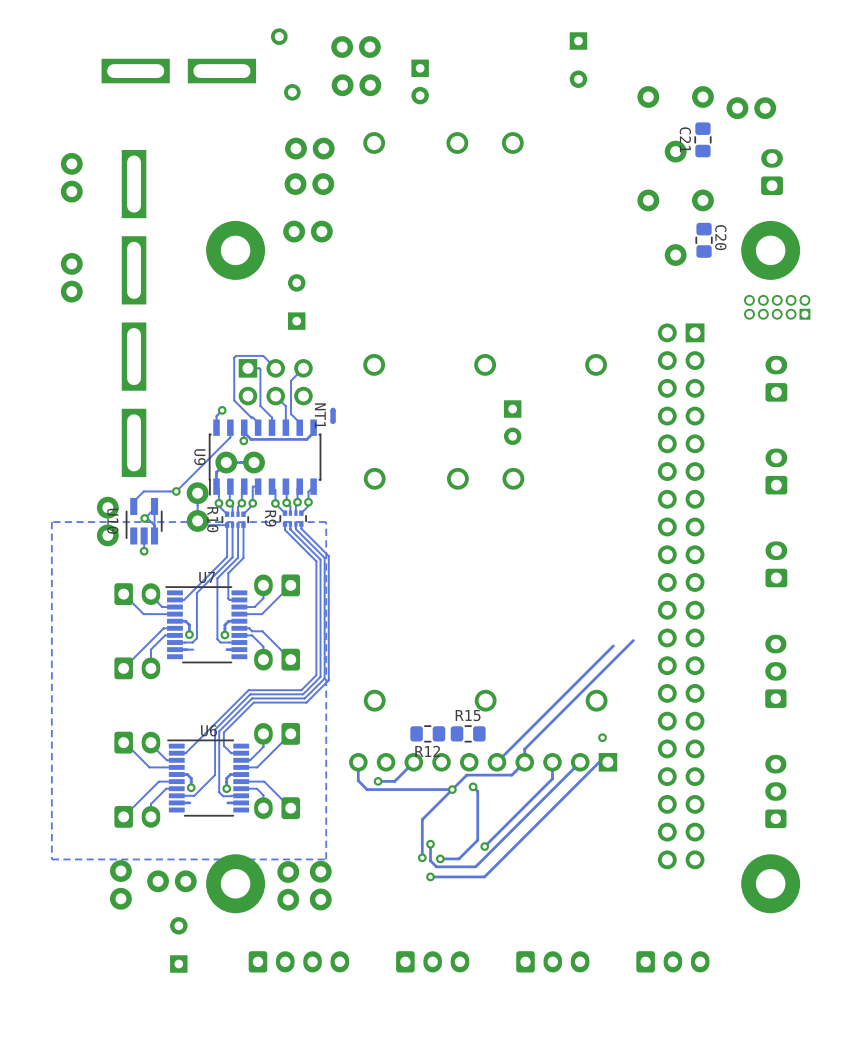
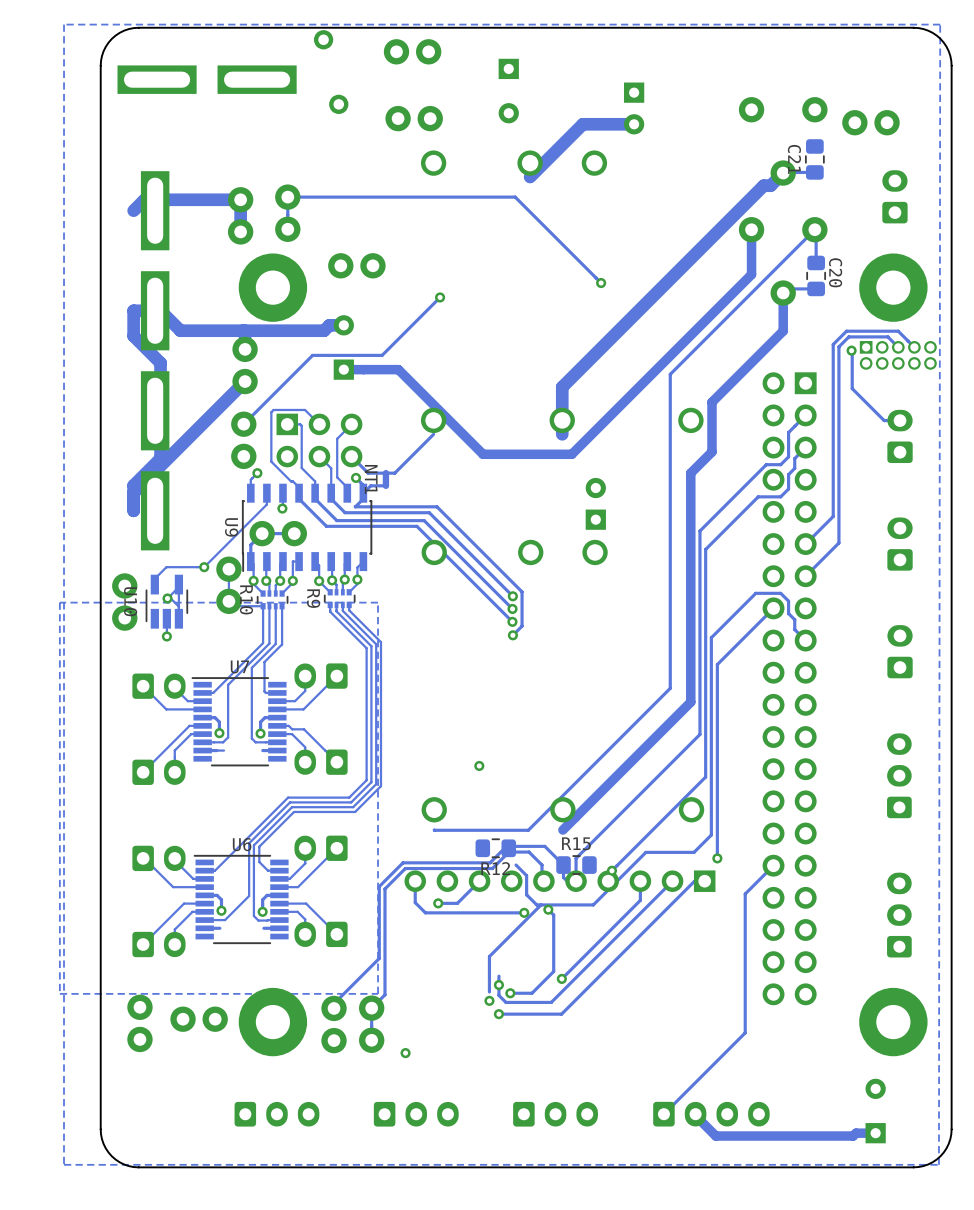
zone outline: none -> (940, 24) (64, 24) (64, 1164) (938, 1164) (940, 24)
board edge: none -> (913, 27) (138, 27) (119, 32) (108, 42) (103, 51) (100, 65) (100, 1129) (103, 1143) (115, 1159) (124, 1164) (138, 1167) (913, 1167) (928, 1164) (943, 1152) (950, 1139) (951, 1129) (951, 65) (948, 51) (940, 38) (928, 30) (913, 27)
part position: (578, 60) -> (508, 91)
part position: (420, 81) -> (634, 108)
part position: (356, 85) -> (414, 118)
track: none -> (634, 124) (582, 124) (530, 177)
part: (309, 148) -> none
track: none -> (814, 172) (783, 172) (770, 185) (763, 185) (562, 387) (562, 434)
part: (71, 177) -> none
track: none -> (133, 210) (144, 199) (240, 199) (240, 231)
part: (309, 184) -> none
part: none -> (287, 213)
part: none -> (240, 215)
track: none -> (287, 229) (287, 197) (515, 197) (601, 283)
track: none -> (751, 229) (751, 274) (571, 454) (483, 454) (398, 369) (343, 369)
track: none -> (816, 262) (814, 229) (670, 374) (670, 688) (528, 830) (434, 830)
via: none -> (601, 283)
track: none -> (816, 288) (787, 288) (783, 293) (783, 331) (711, 402) (711, 451) (690, 473) (690, 702) (562, 830)
track: none -> (440, 297) (382, 355) (312, 355) (243, 424)
via: none -> (440, 297)
part: (71, 277) -> none
track: none -> (343, 325) (329, 325) (324, 330) (180, 330) (160, 310) (133, 310) (133, 336) (160, 362) (160, 458) (133, 485) (133, 510)
track: none -> (898, 347) (887, 336) (848, 336) (838, 346) (838, 542) (805, 576)
track: none -> (914, 347) (898, 331) (846, 331) (833, 344) (833, 516) (805, 544)
track: none -> (851, 350) (852, 388) (884, 420) (900, 420)
via: none -> (851, 350)
part rotation: 0° (777, 307) -> 180° (898, 355)
part: none -> (245, 365)
track: none -> (245, 381) (133, 492)
track: none -> (805, 415) (788, 432) (788, 456) (780, 464) (766, 464) (699, 531) (699, 734) (576, 858) (576, 890) (563, 877) (563, 865) (544, 846) (506, 846) (490, 862) (403, 862) (379, 886) (379, 958) (329, 1008)
track: none -> (433, 434) (394, 473) (368, 473) (351, 456)
part: none -> (243, 440)
track: none -> (805, 447) (794, 458) (794, 468) (788, 474) (788, 488) (780, 496) (758, 496) (705, 549) (705, 777) (611, 870)
track: none -> (356, 477) (363, 485) (363, 493) (370, 485) (385, 485)
via: none -> (356, 477)
part rotation: 0° (512, 422) -> 180° (595, 503)
track: (244, 427) (244, 432) (251, 439) (306, 439) -> (512, 635) (522, 626) (522, 591) (436, 506) (355, 506)
track: none -> (299, 493) (299, 498) (326, 526) (416, 526) (512, 621)
track: none -> (315, 493) (315, 498) (336, 520) (424, 520) (512, 608)
track: none -> (331, 493) (331, 498) (345, 512) (429, 512) (512, 596)
via: none -> (512, 596)
via: none -> (512, 608)
track: none -> (773, 608) (717, 664) (717, 858)
via: none -> (512, 621)
via: none -> (512, 635)
track: none -> (805, 640) (794, 629) (794, 619) (788, 613) (788, 601) (780, 593) (755, 593) (711, 637) (711, 835) (694, 852) (645, 852) (593, 904) (536, 904) (526, 894) (526, 875) (516, 865)
track: (633, 640) (524, 749) (524, 762) (511, 775) (466, 775) (422, 819) (422, 827) -> (541, 904) (489, 956)
track: (613, 645) (497, 762) -> none
via: none -> (479, 765)
R15 position: (468, 733) -> (576, 865)
via position: (602, 737) -> (717, 858)
track: none -> (773, 865) (745, 893) (745, 1032) (663, 1114)
via: none -> (611, 870)
track: none -> (543, 890) (542, 888) (542, 865) (529, 852) (508, 852) (492, 868) (405, 868) (384, 888) (384, 994) (371, 1008) (371, 1040)
via: (430, 844) -> none
via: none -> (498, 985)
via: (422, 857) -> none
via: none -> (489, 1000)
via: none -> (405, 1053)
part: (178, 944) -> none
part: none -> (875, 1111)
part: (298, 961) -> none
part: (432, 961) -> none
part: (552, 961) -> none
part: (672, 961) -> none
part: none -> (276, 1114)
part: none -> (416, 1114)
part: none -> (555, 1114)
track: none -> (695, 1114) (715, 1136) (853, 1136) (856, 1133) (875, 1133)
part: none -> (711, 1114)

